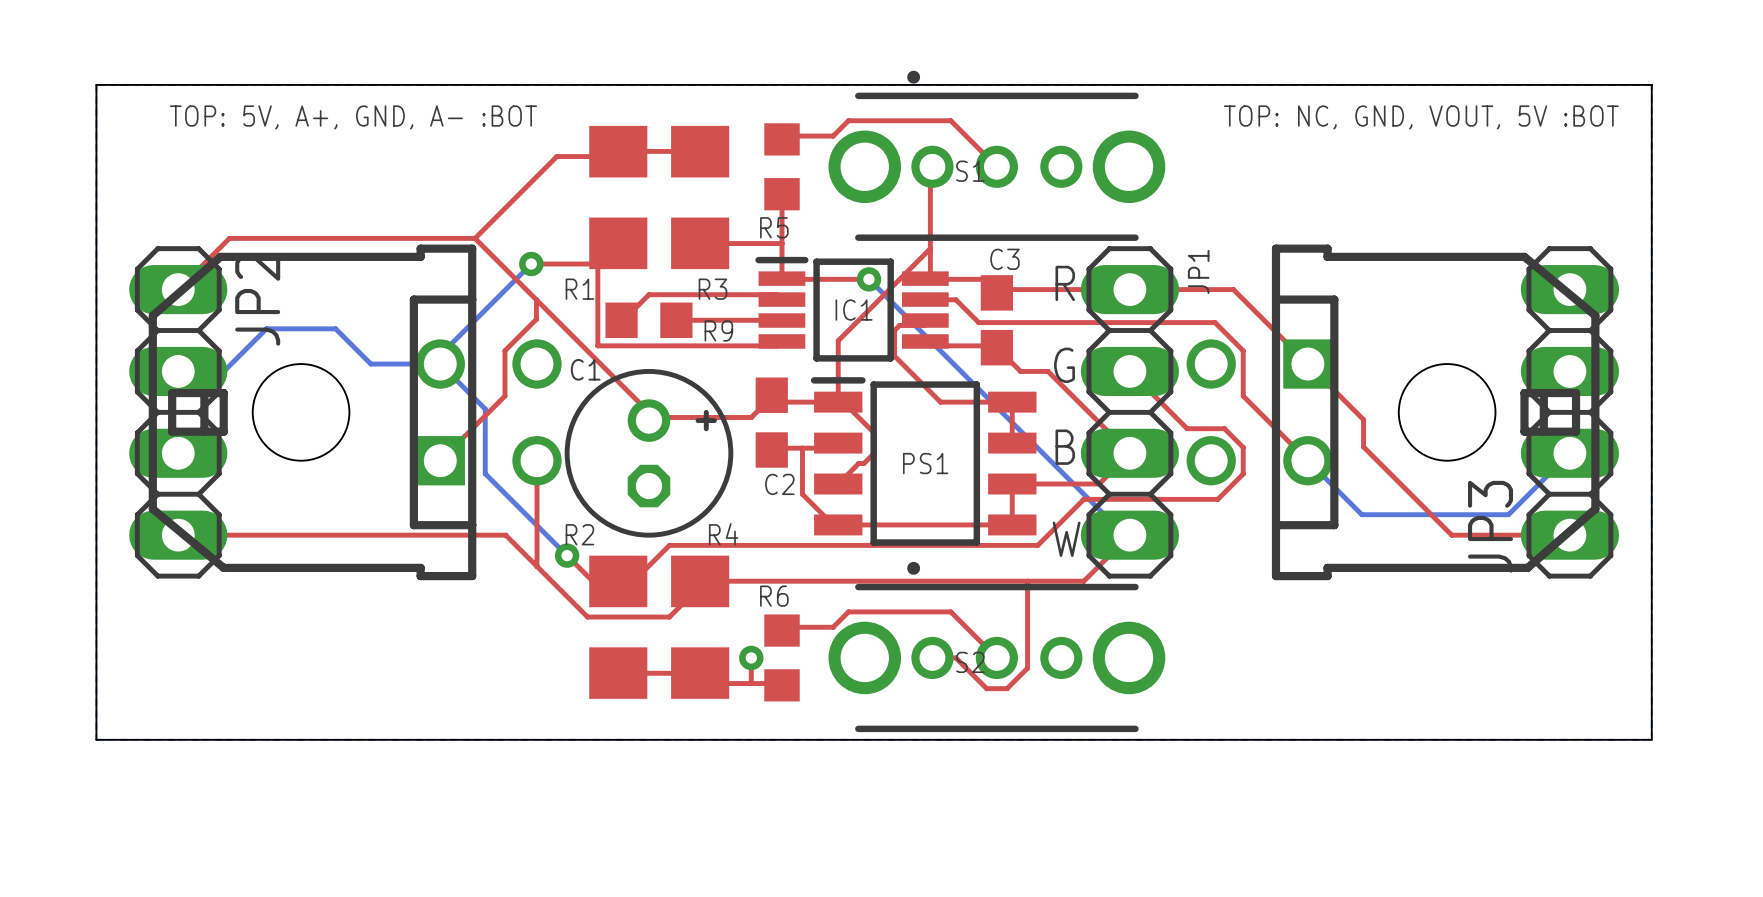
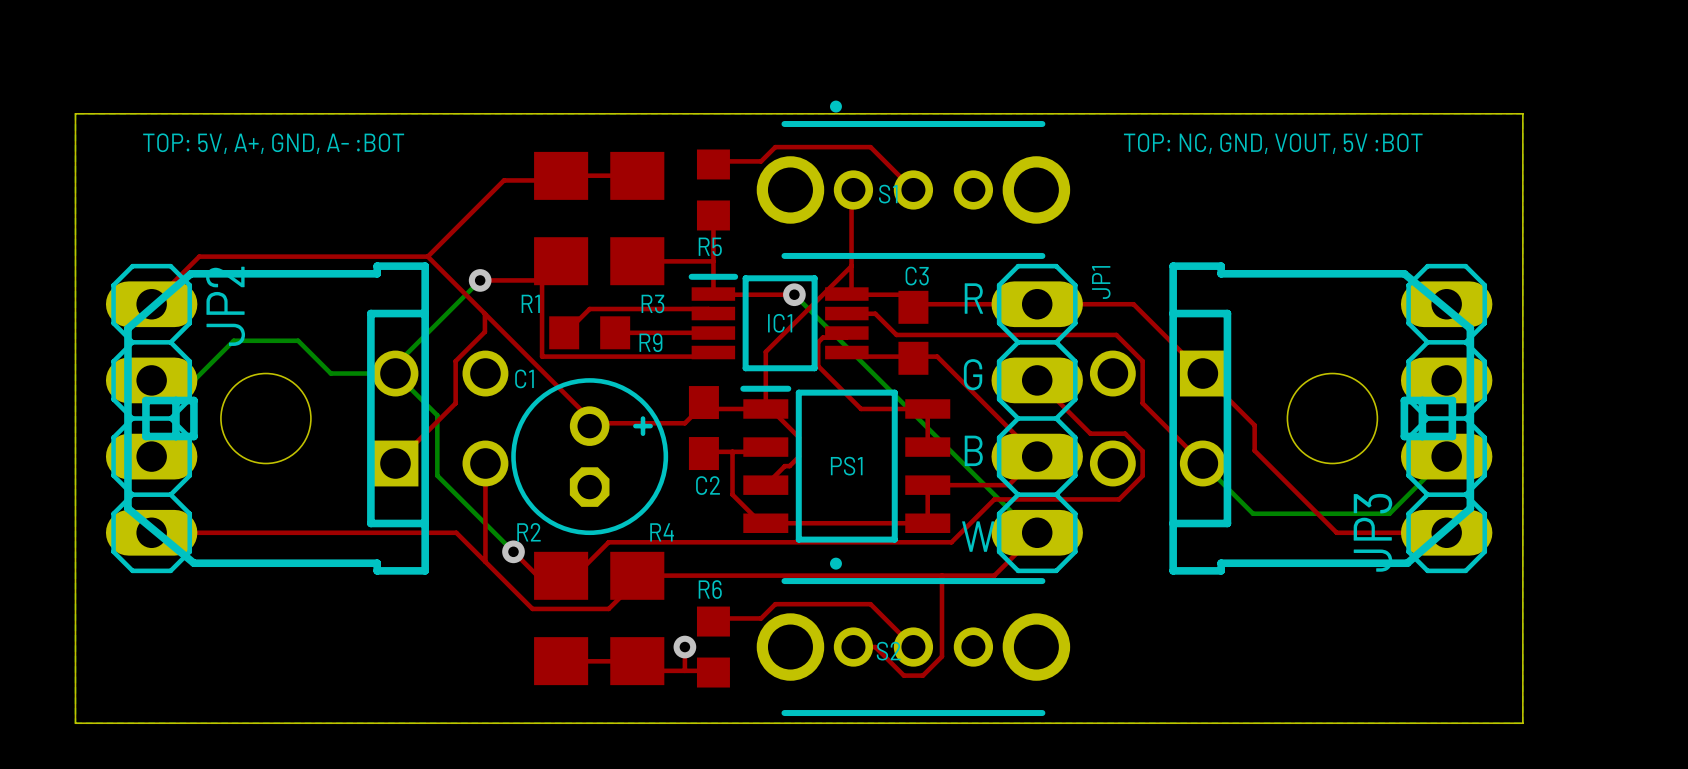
top track: (996, 350) (996, 347) (1020, 371) (1048, 371) -> (913, 356) (937, 356) (961, 380)

